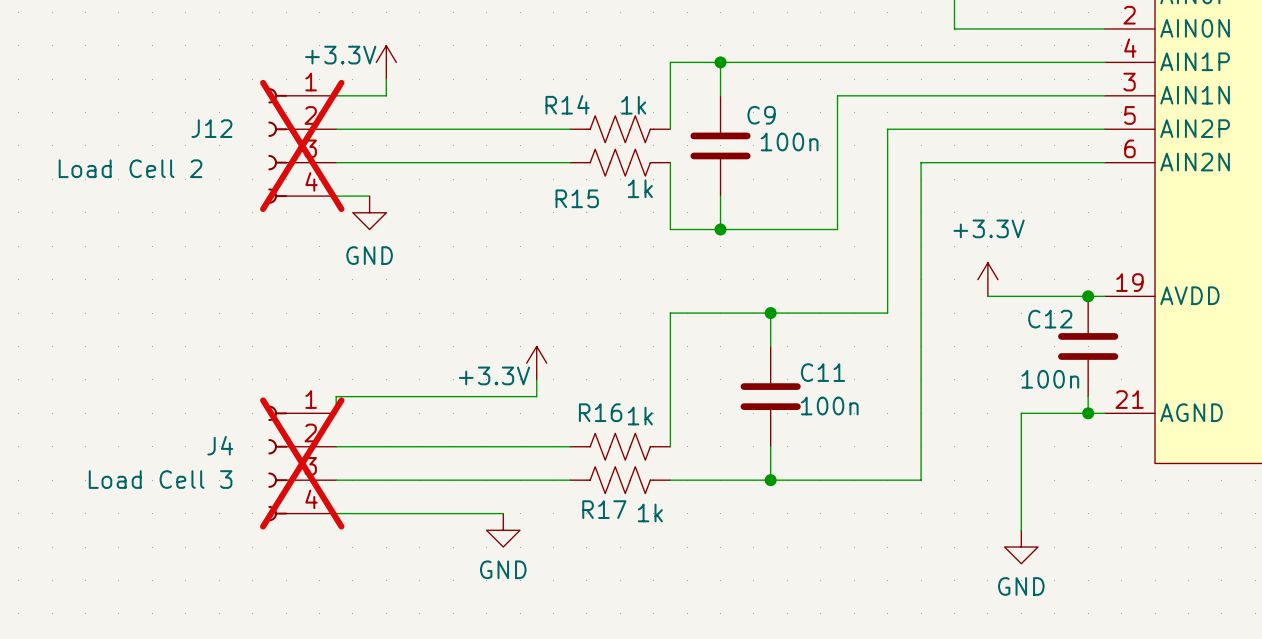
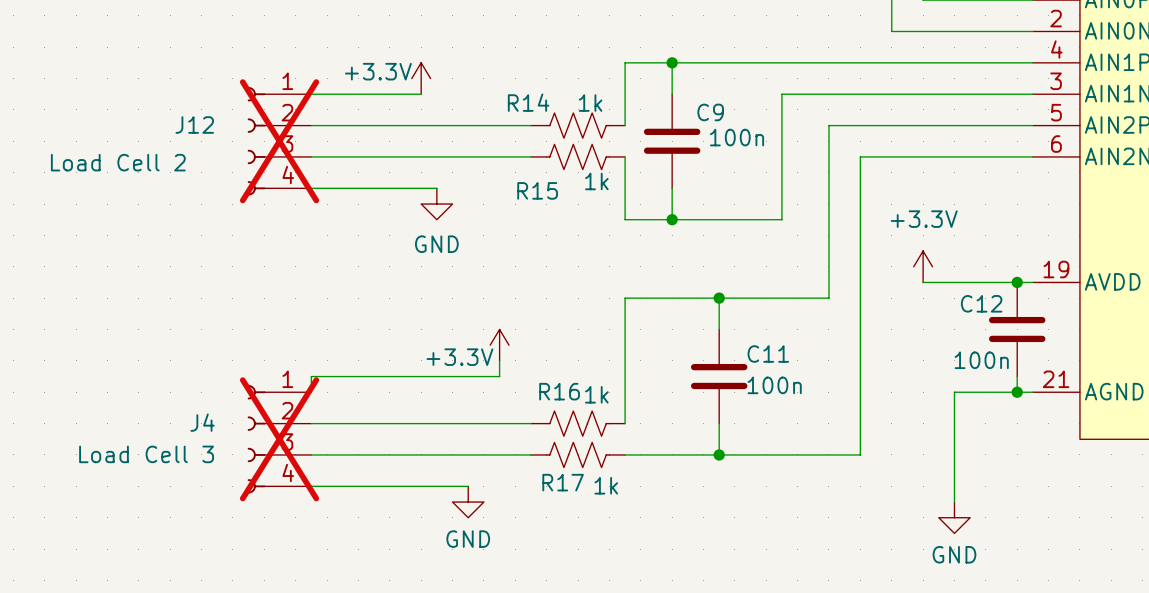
power symbol position: +3.3V (386, 62) -> +3.3V (421, 78)
wire: (386, 79) (386, 95) -> (421, 94) (358, 94)
wire: none -> (342, 188) (436, 188)
power symbol position: GND (369, 212) -> GND (436, 204)

